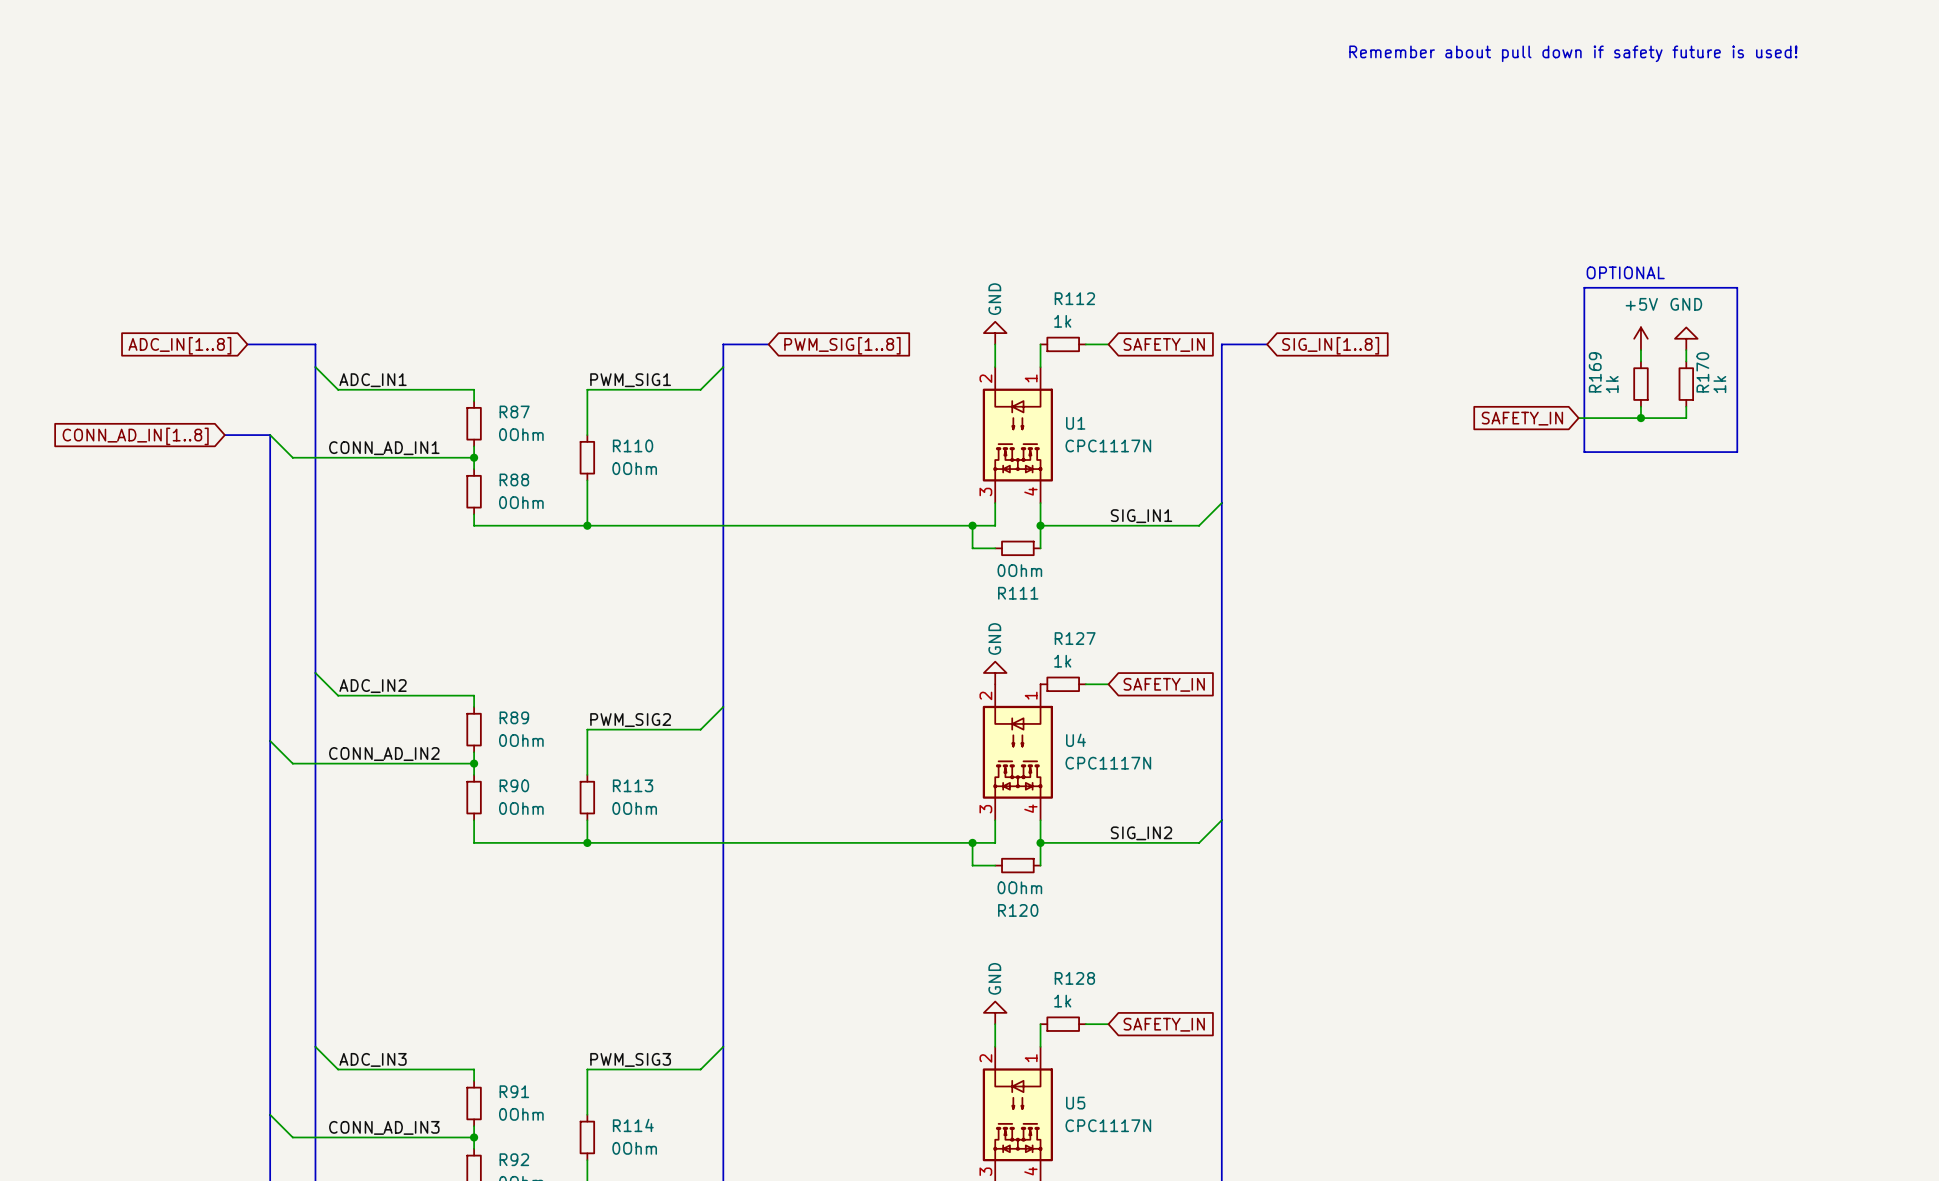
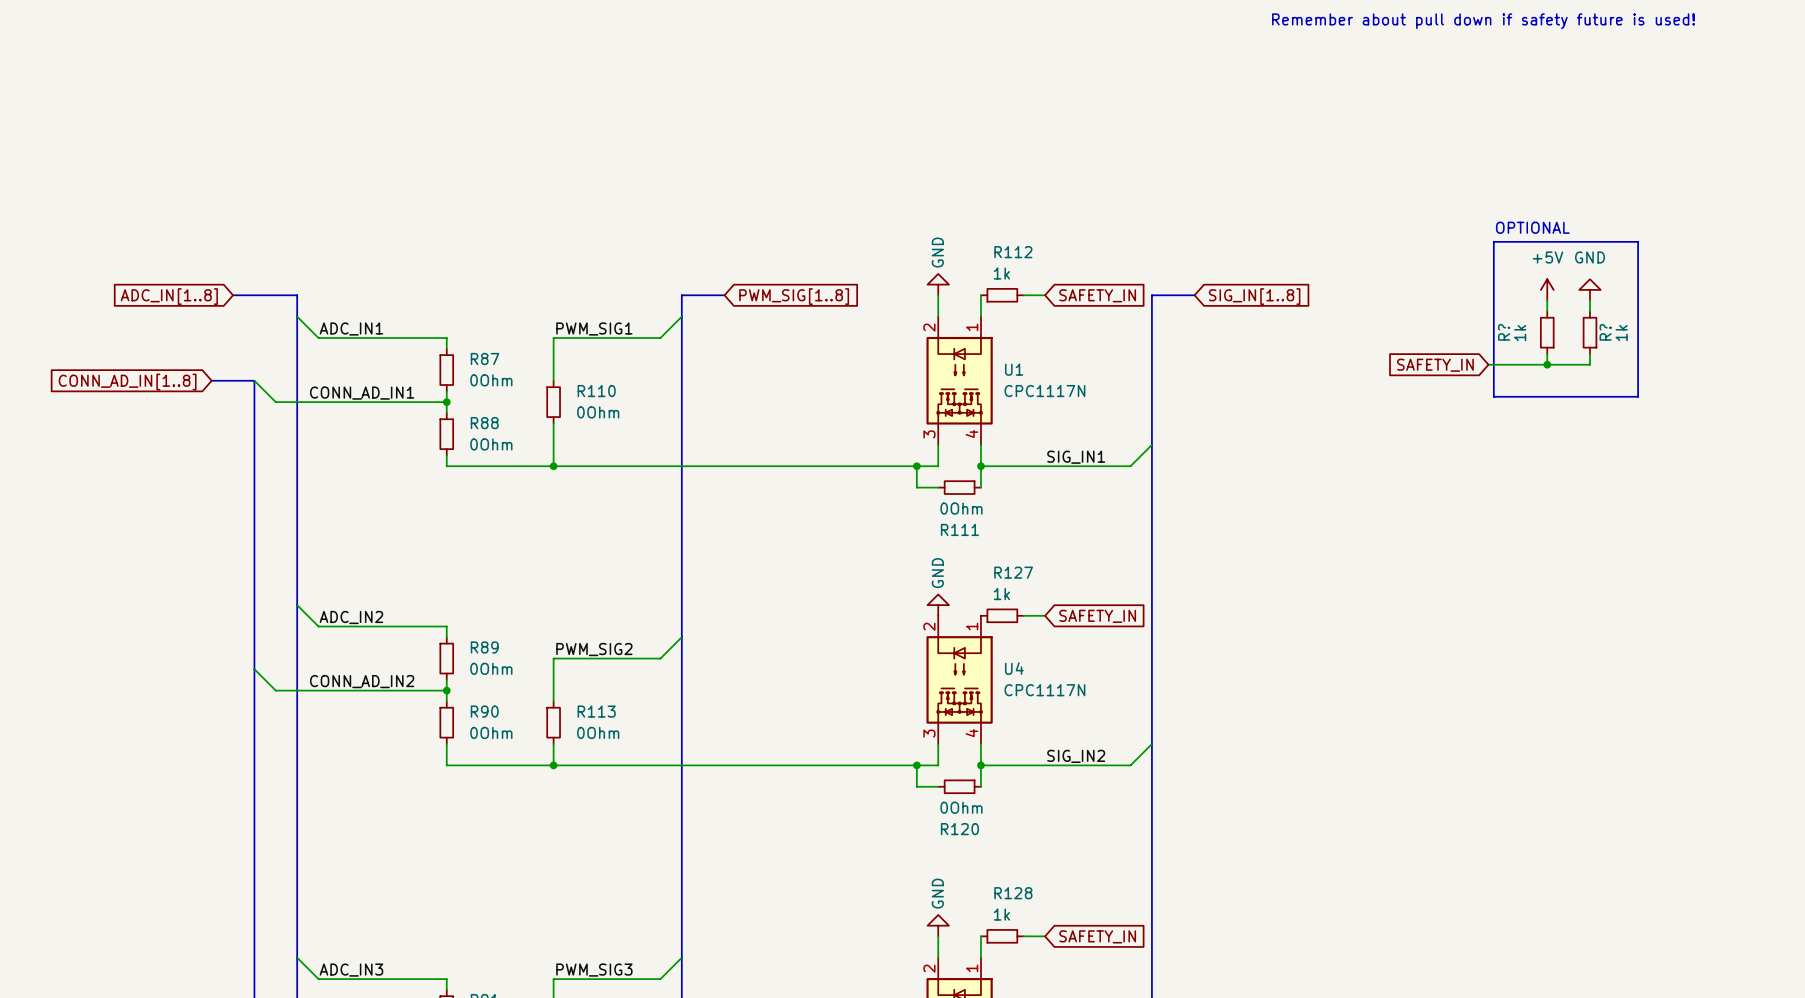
R169 name: R169 (1595, 372) -> R? (1504, 332)
R170 name: R170 (1702, 372) -> R? (1605, 332)

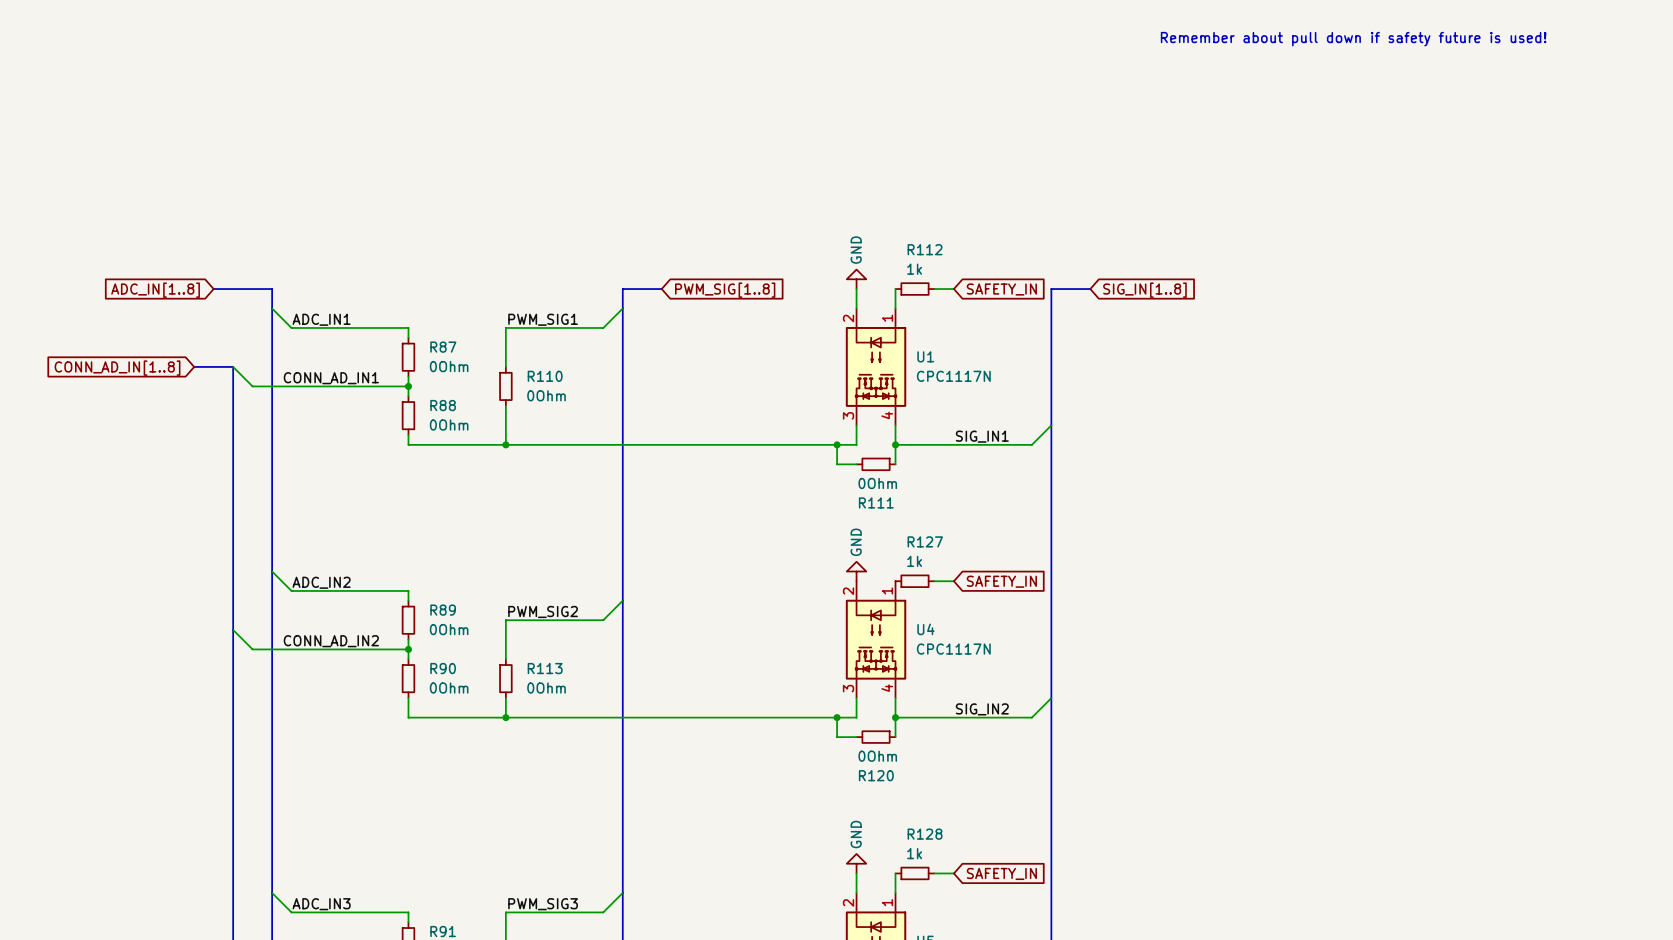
text: OPTIONAL (1532, 227) -> none
line: (1493, 241) (1638, 241) (1638, 396) (1493, 396) (1493, 241) -> none
power symbol: +5V (1547, 289) -> none
power symbol: GND (1590, 289) -> none
wire: (1547, 300) (1547, 311) -> none
wire: (1590, 300) (1590, 311) -> none
R?: 1k (1547, 332) -> none
R?: 1k (1590, 332) -> none
wire: (1547, 354) (1547, 364) -> none
wire: (1590, 354) (1590, 364) (1488, 364) -> none
junction: (1547, 364) -> none
global label: SAFETY_IN (1435, 365) -> none

